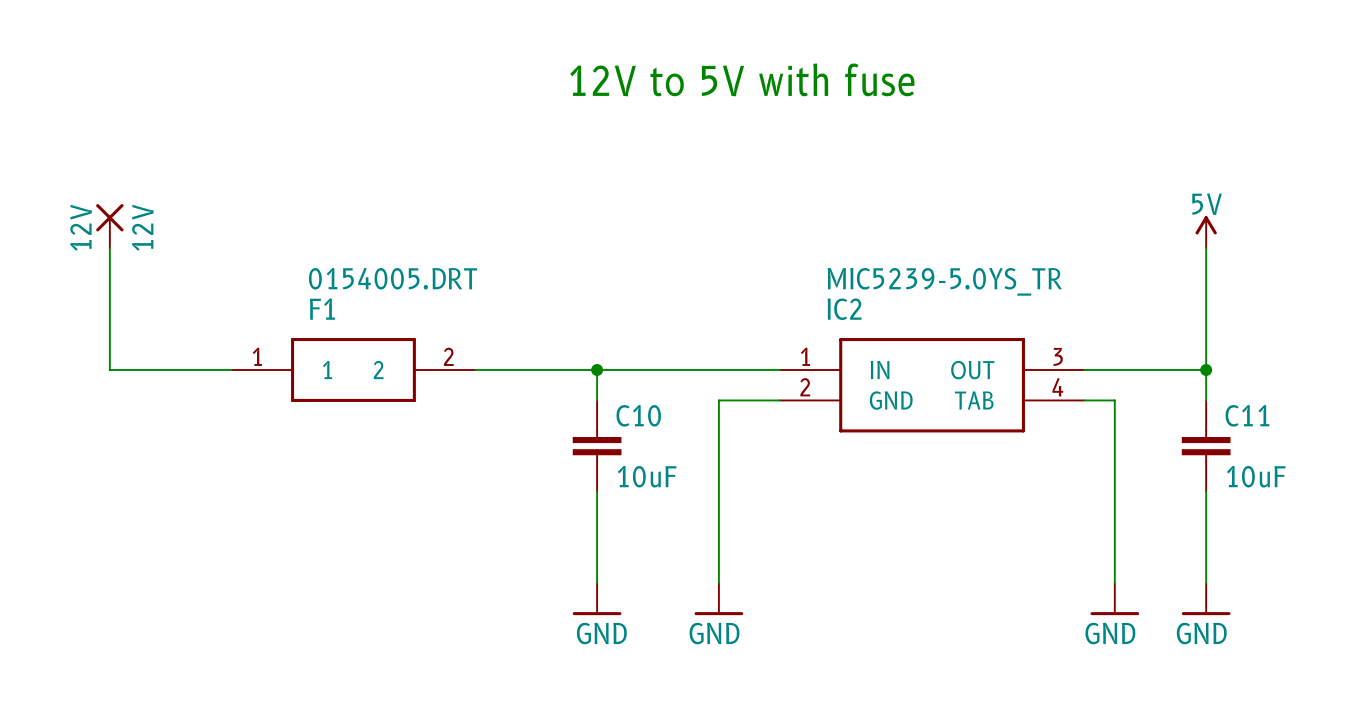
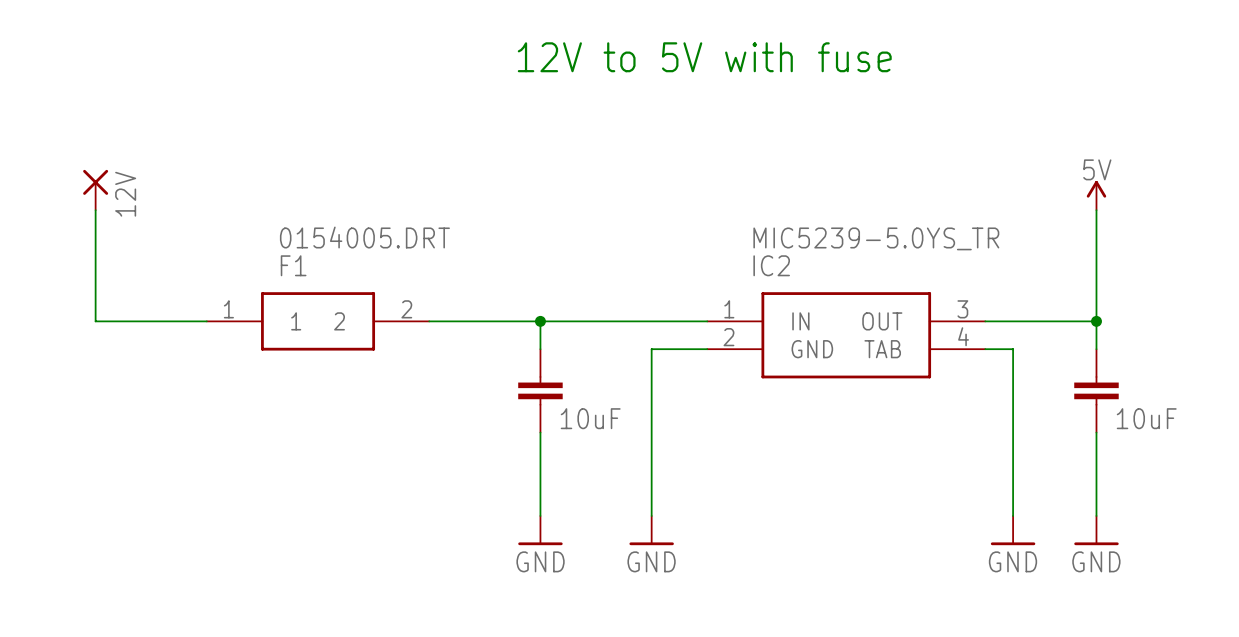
12V value: 12V (81, 227) -> none
C10 name: C10 (638, 415) -> none
C11 name: C11 (1247, 415) -> none

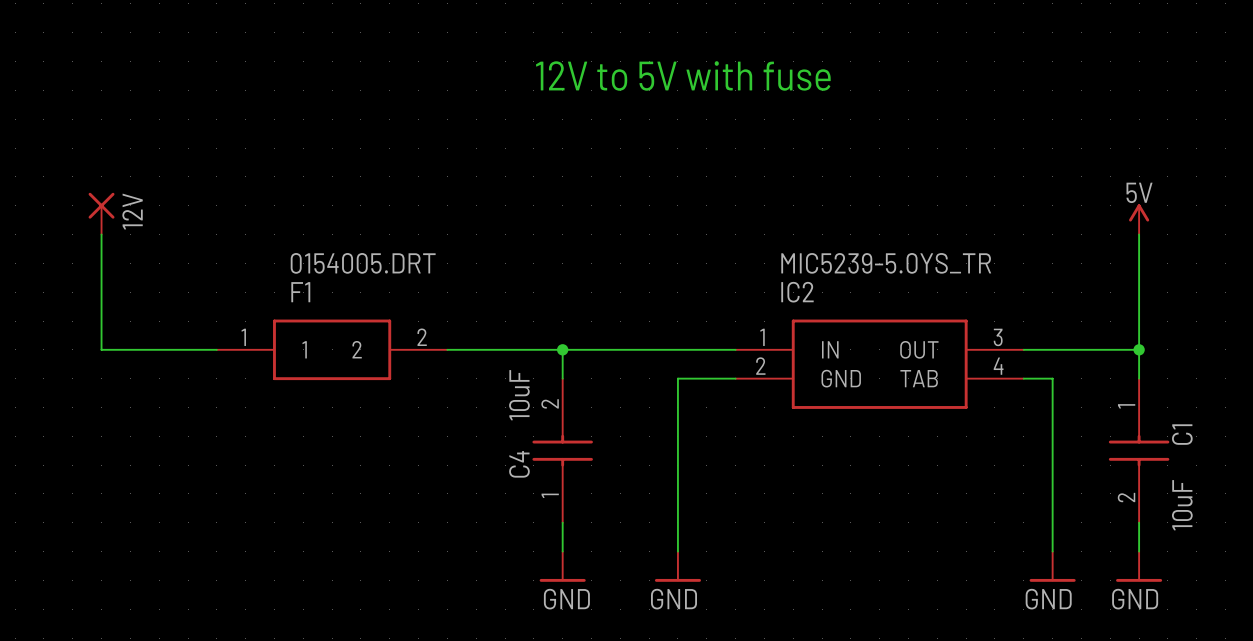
part: 10uF (540, 390) -> none
part: 10uF (1096, 390) -> none
C4: none -> 10uF (562, 450)
C1: none -> 10uF (1139, 450)

